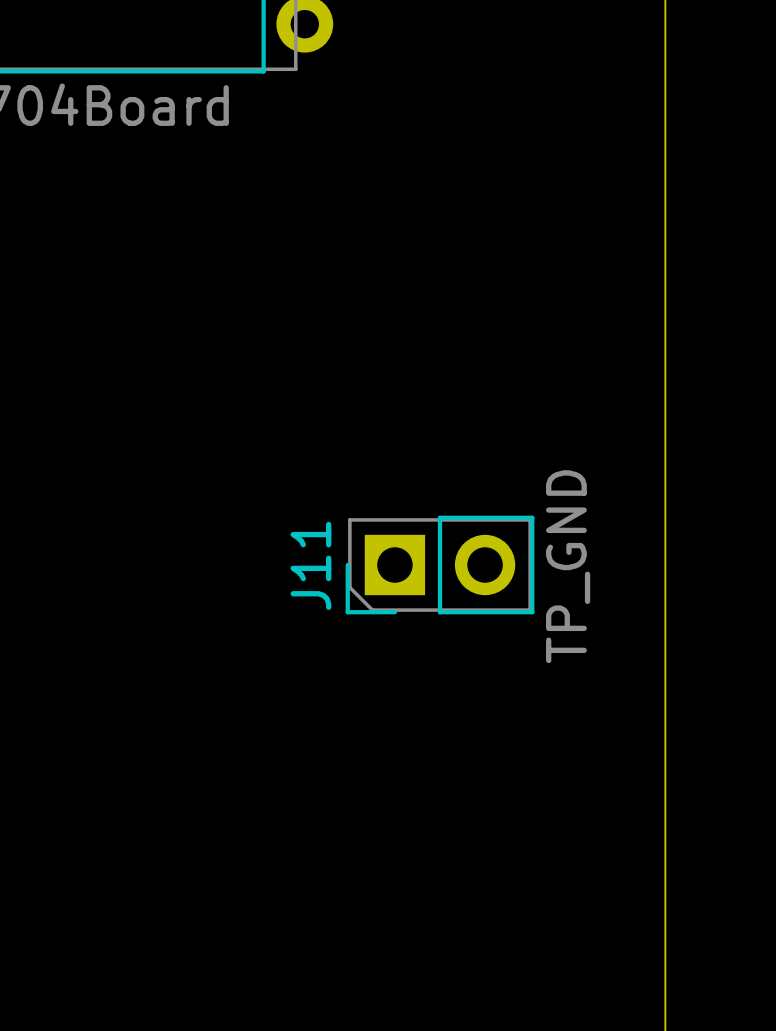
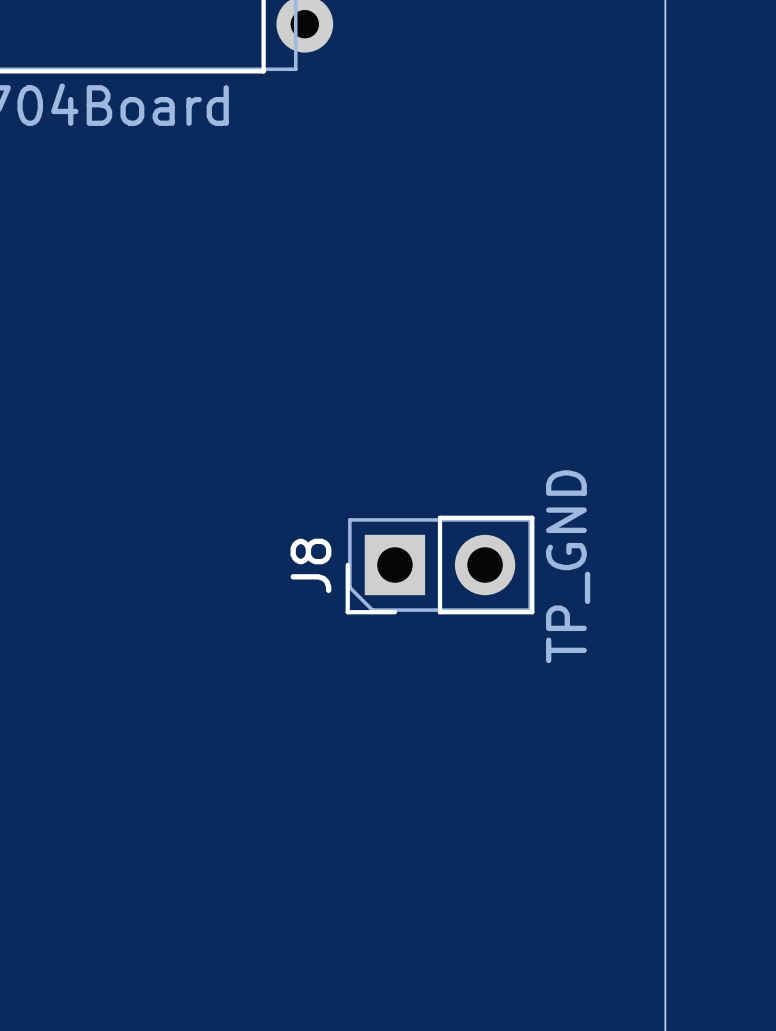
J11 name: J11 (310, 565) -> J8 (310, 565)

